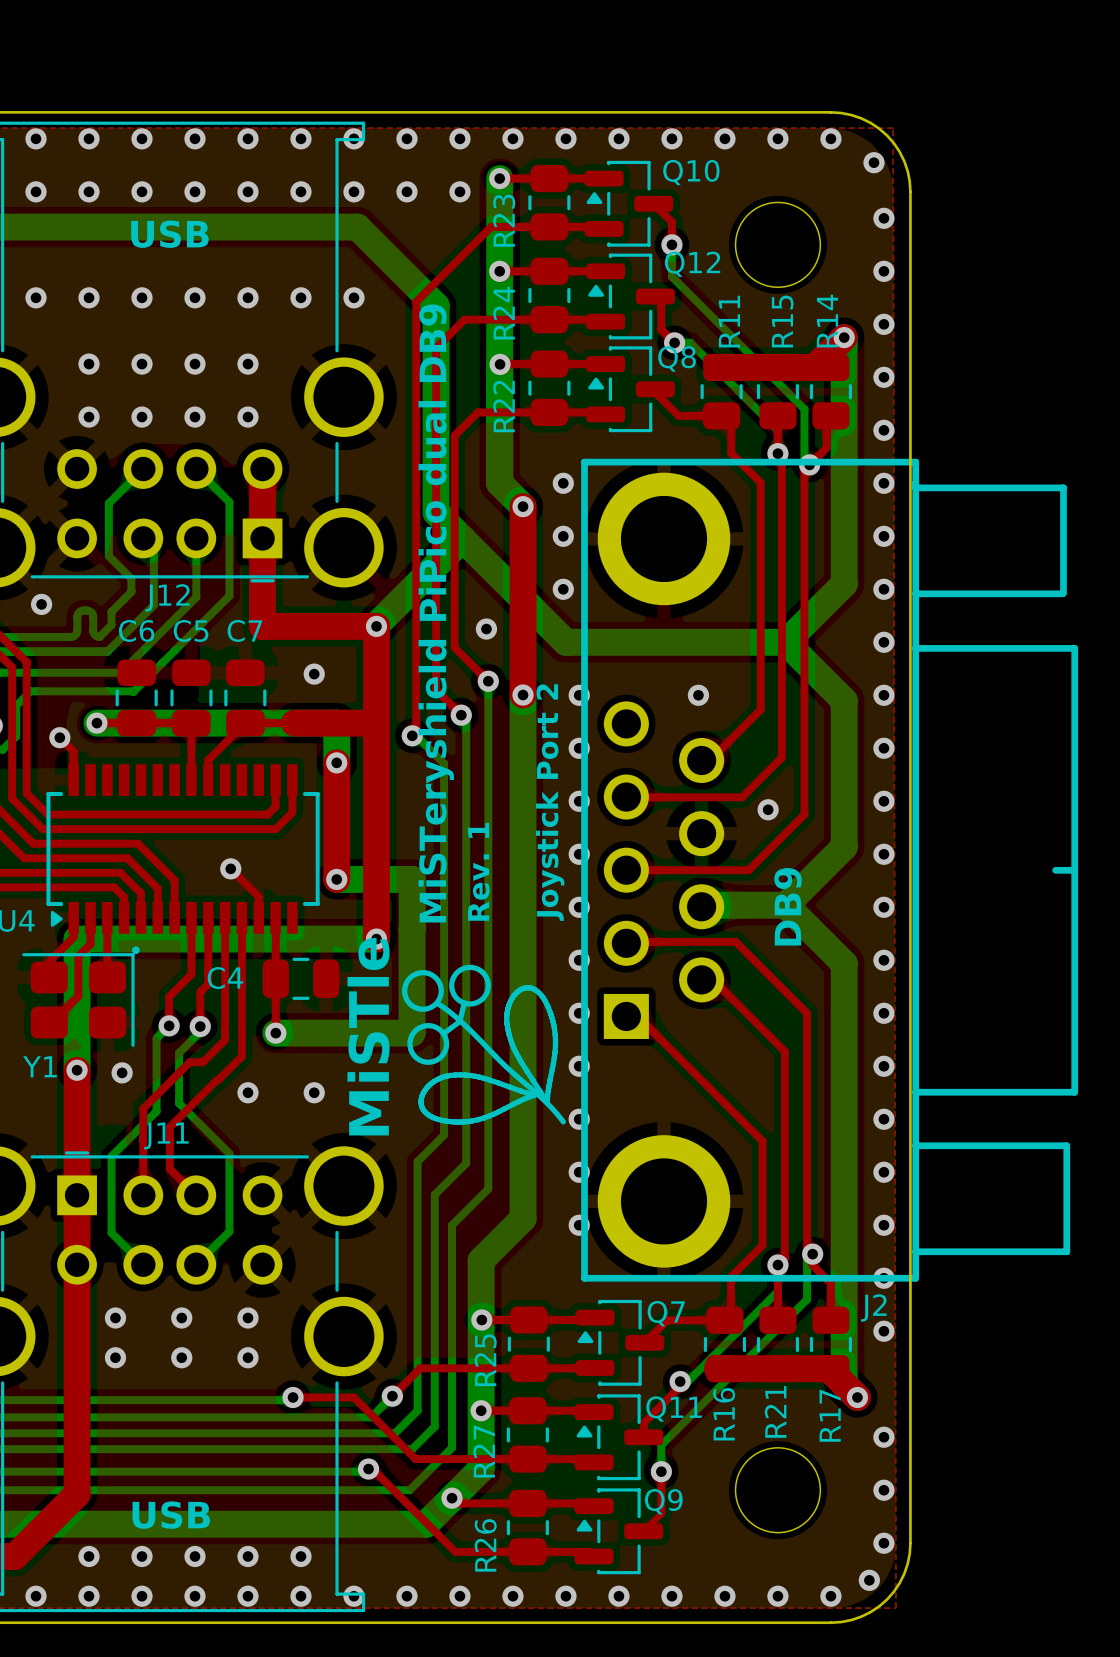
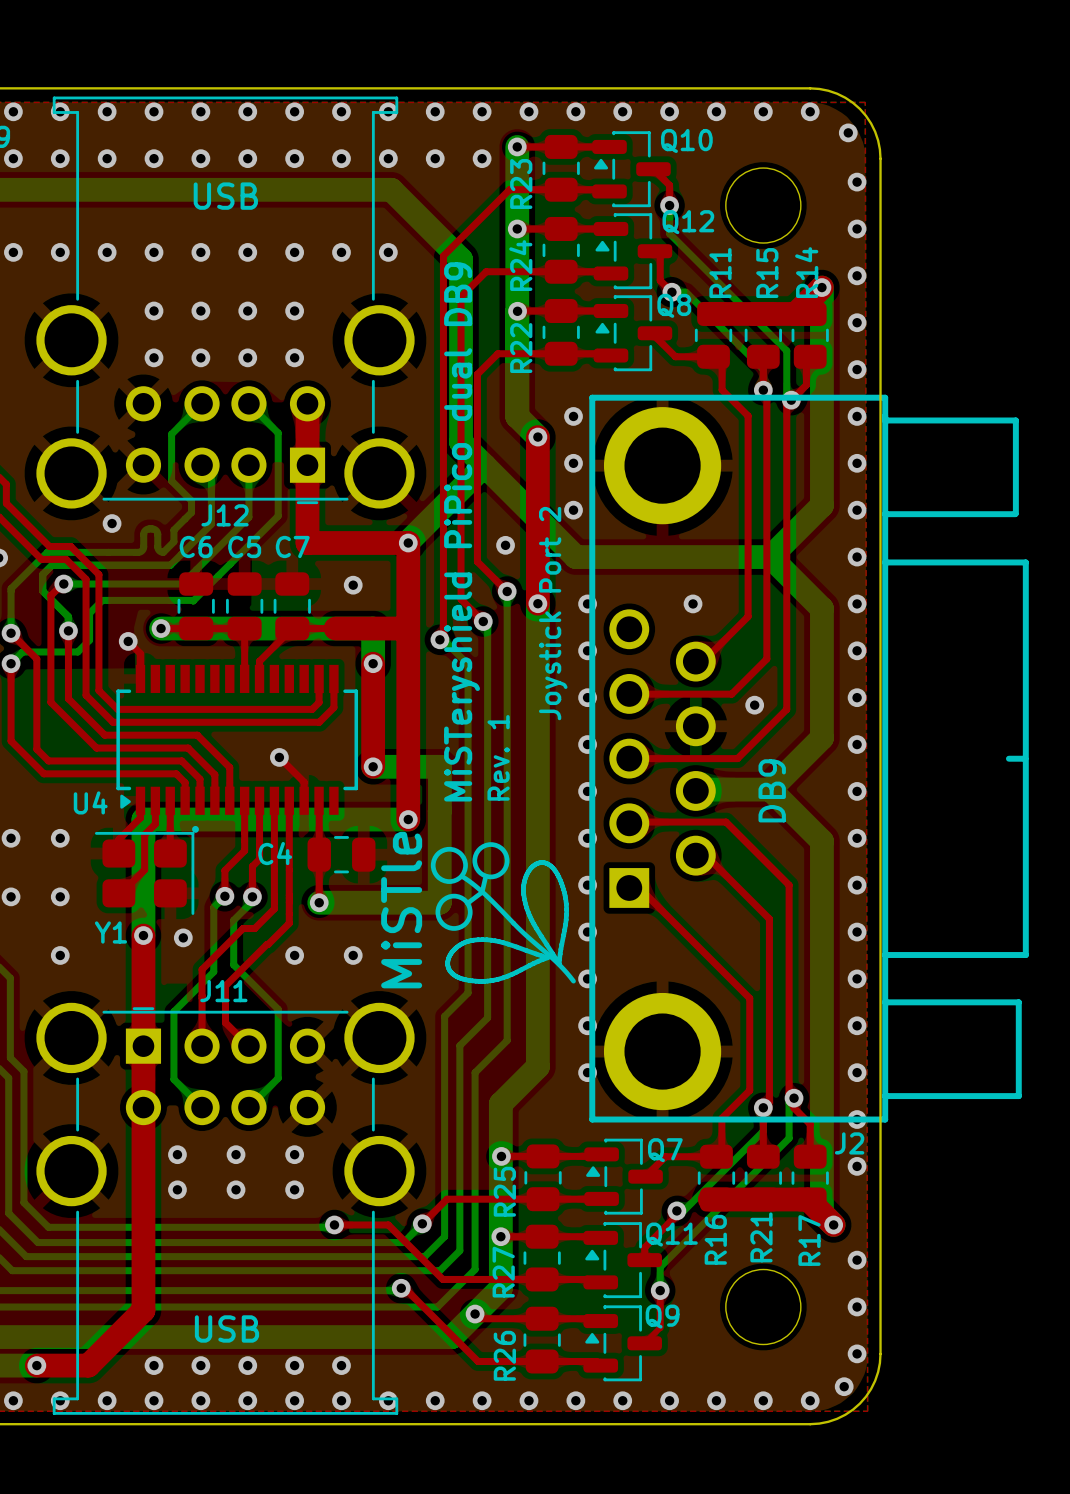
text position: Joystick Port 2 (550, 802) -> Joystick Port 2 (553, 613)

